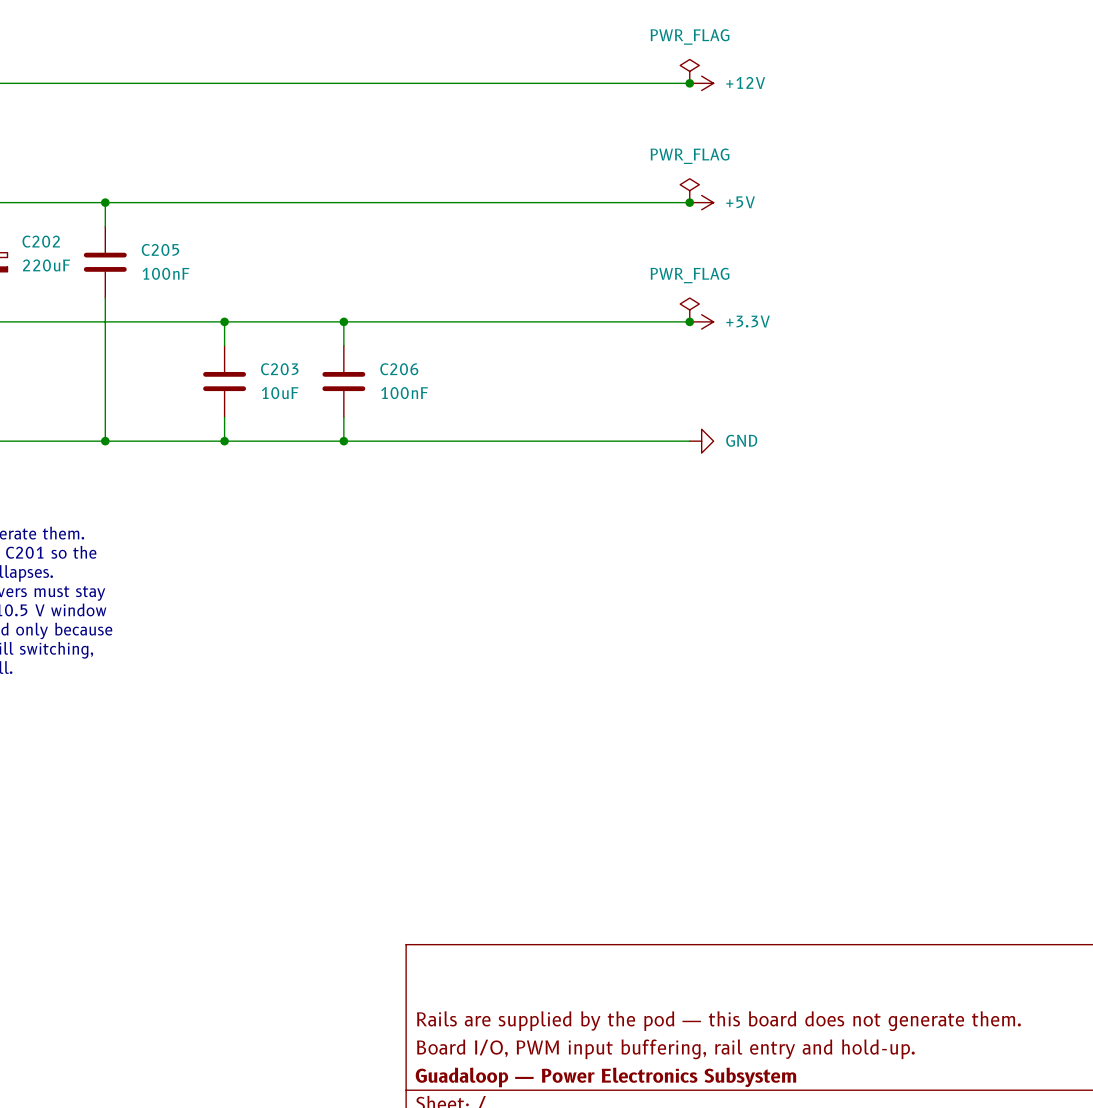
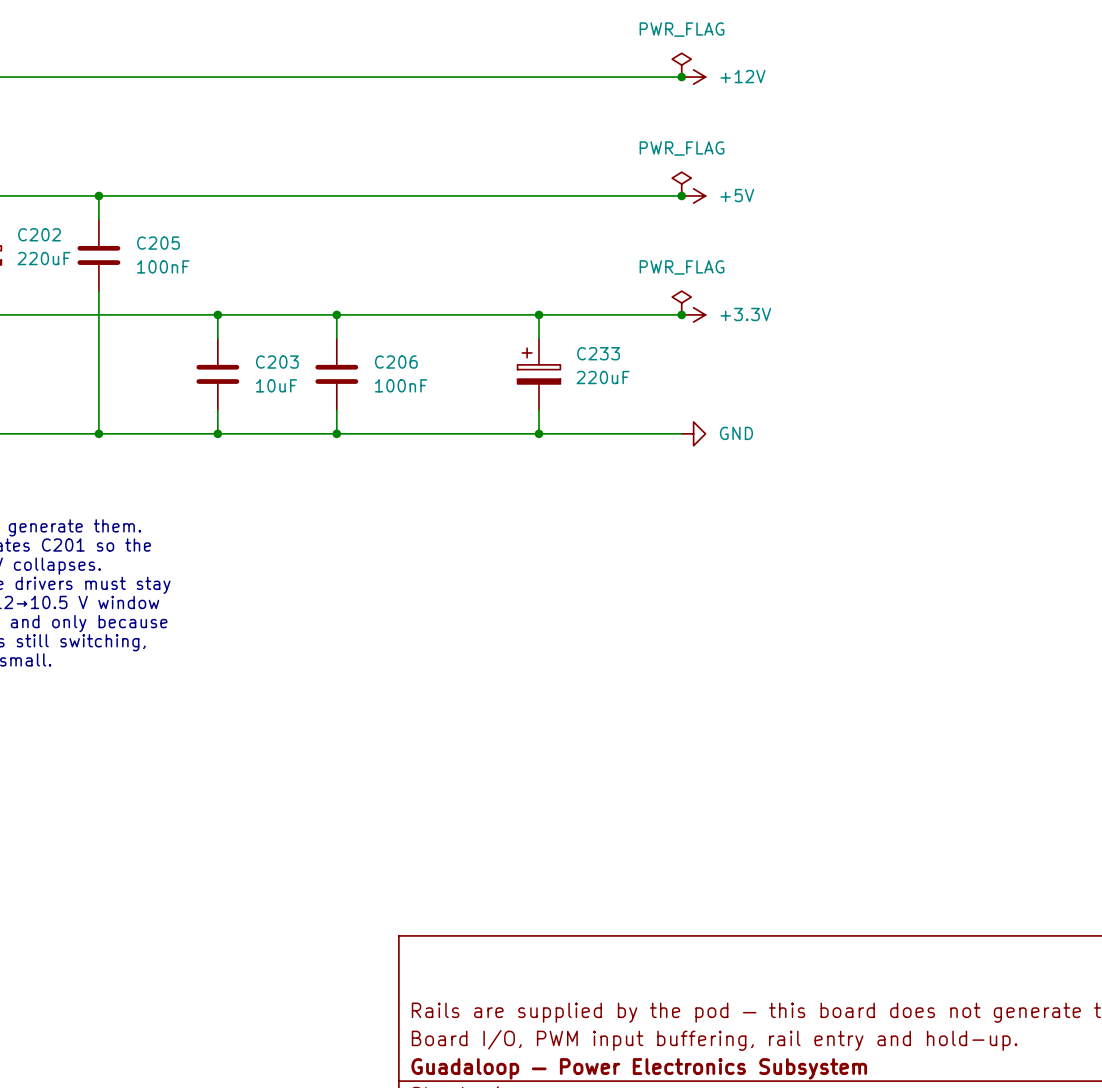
wire: none -> (538, 314) (538, 338)
junction: none -> (538, 314)
C233: none -> 220uF (538, 374)
wire: none -> (538, 410) (538, 433)
junction: none -> (538, 433)

